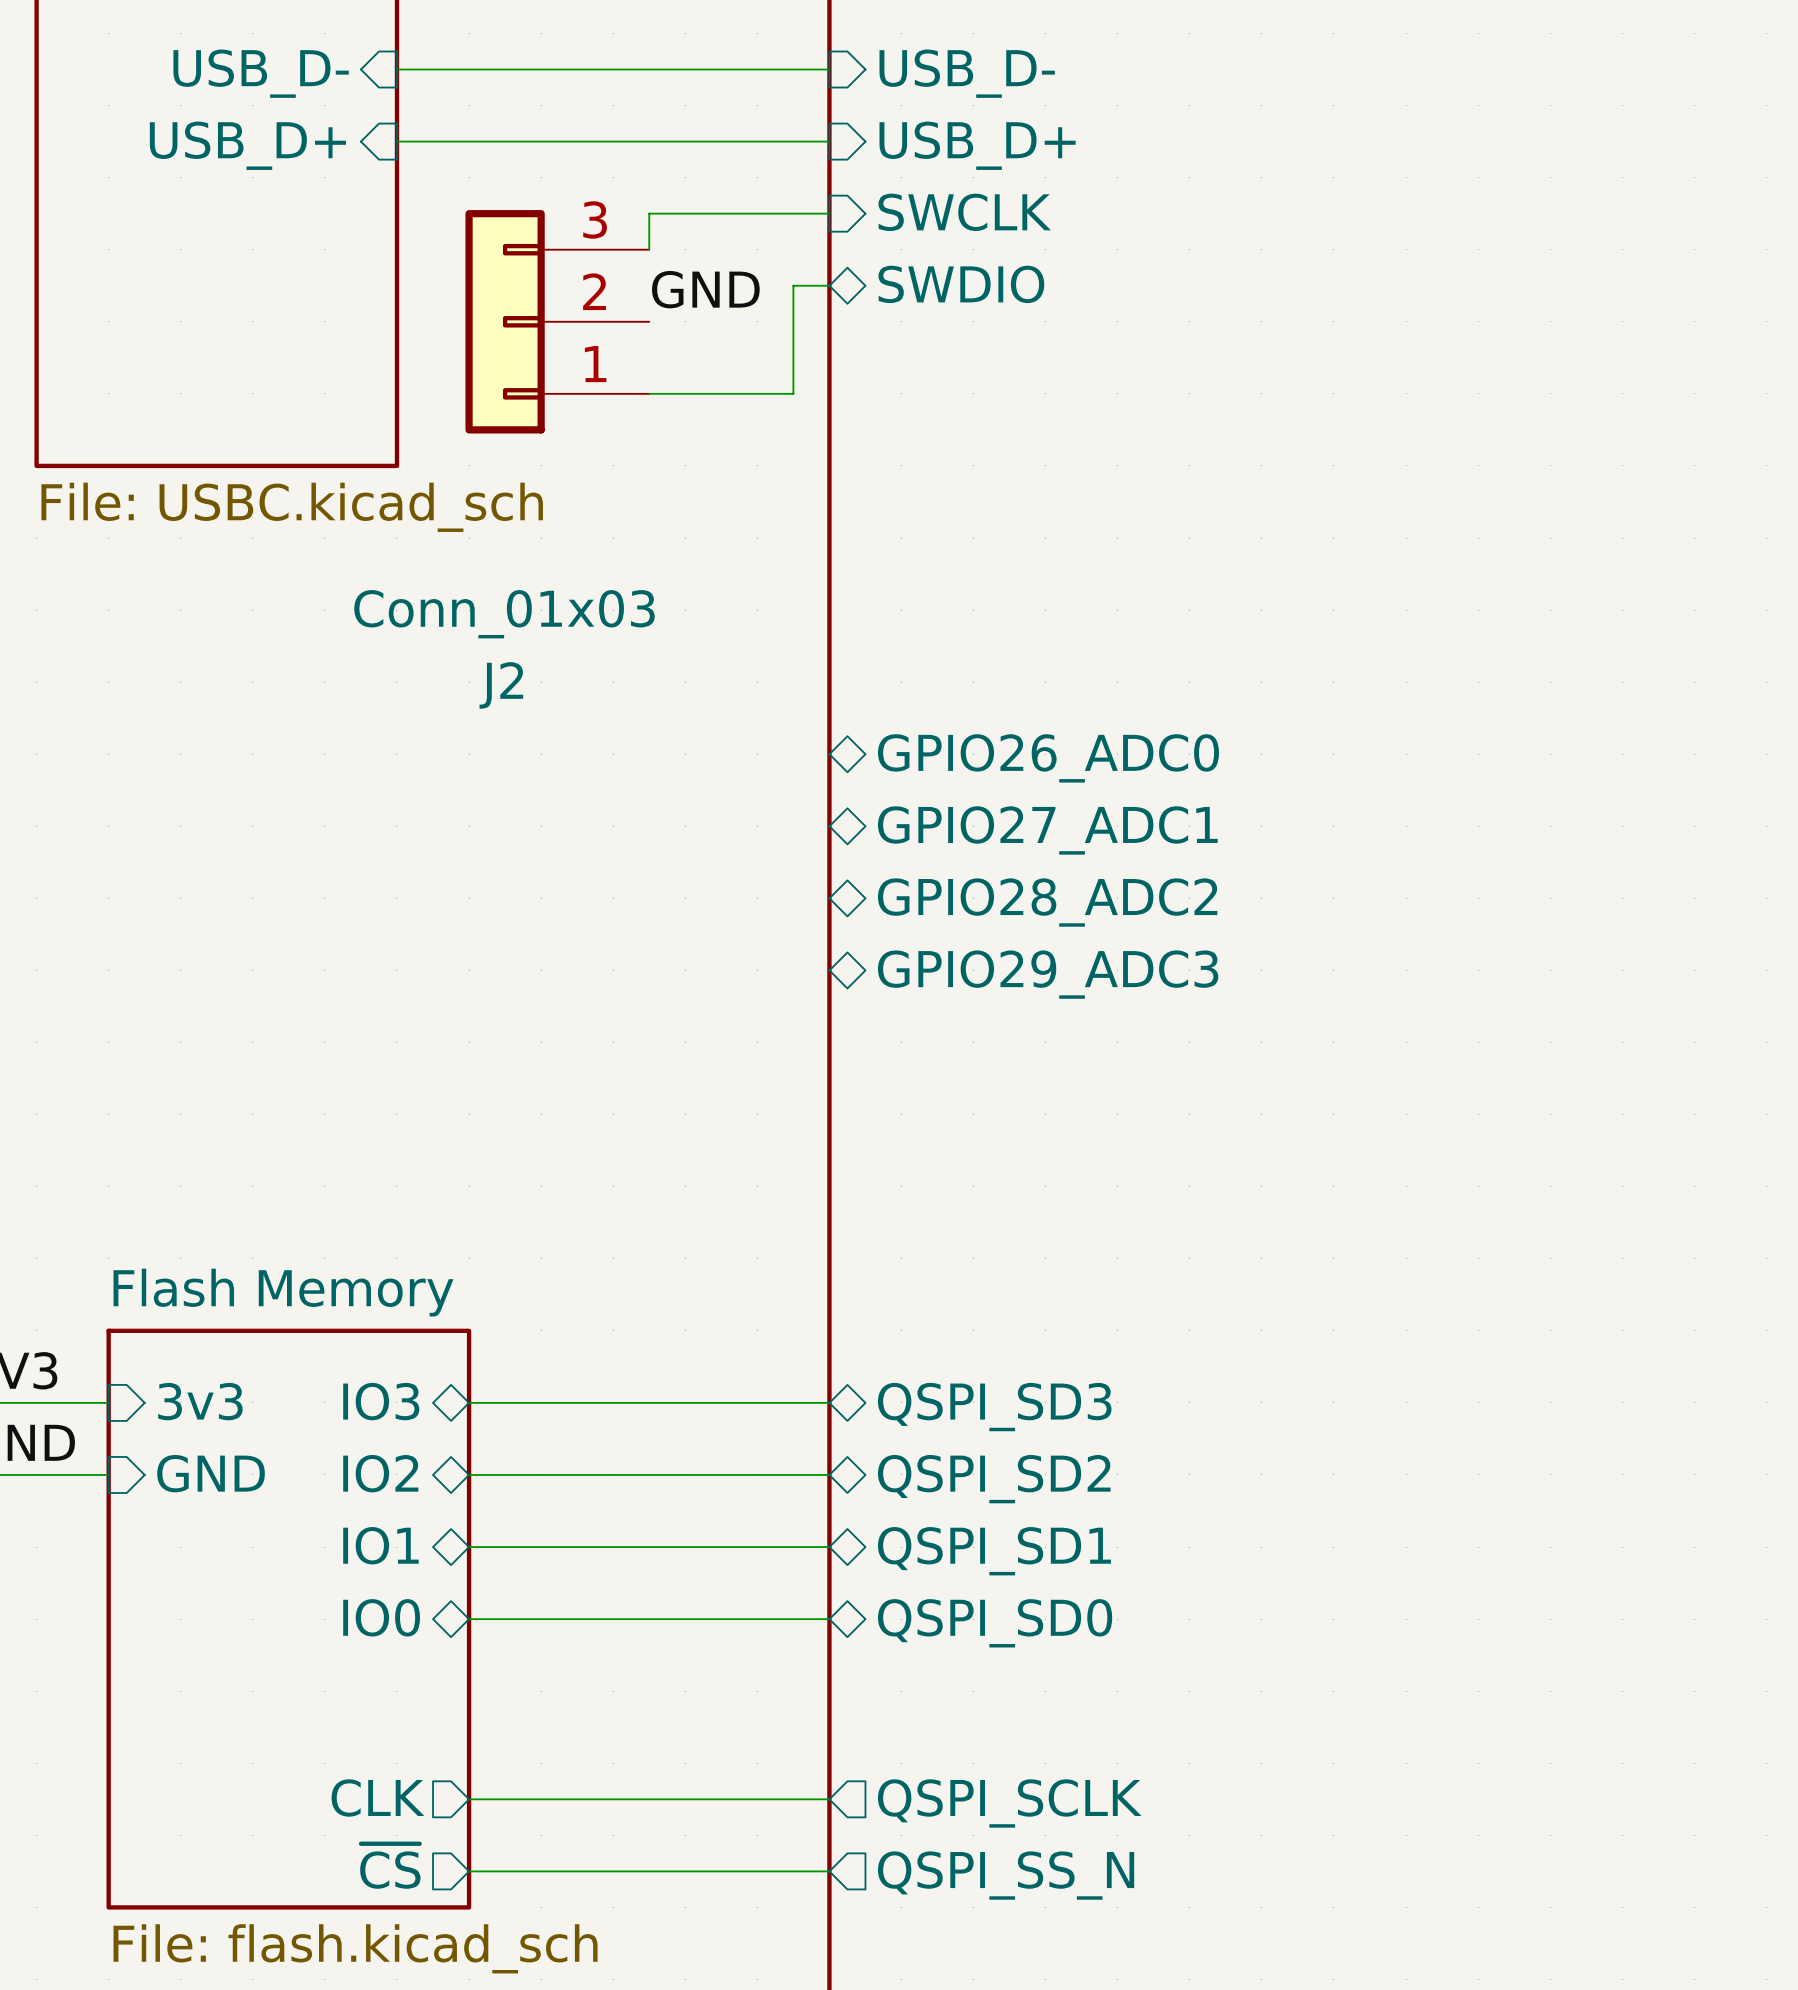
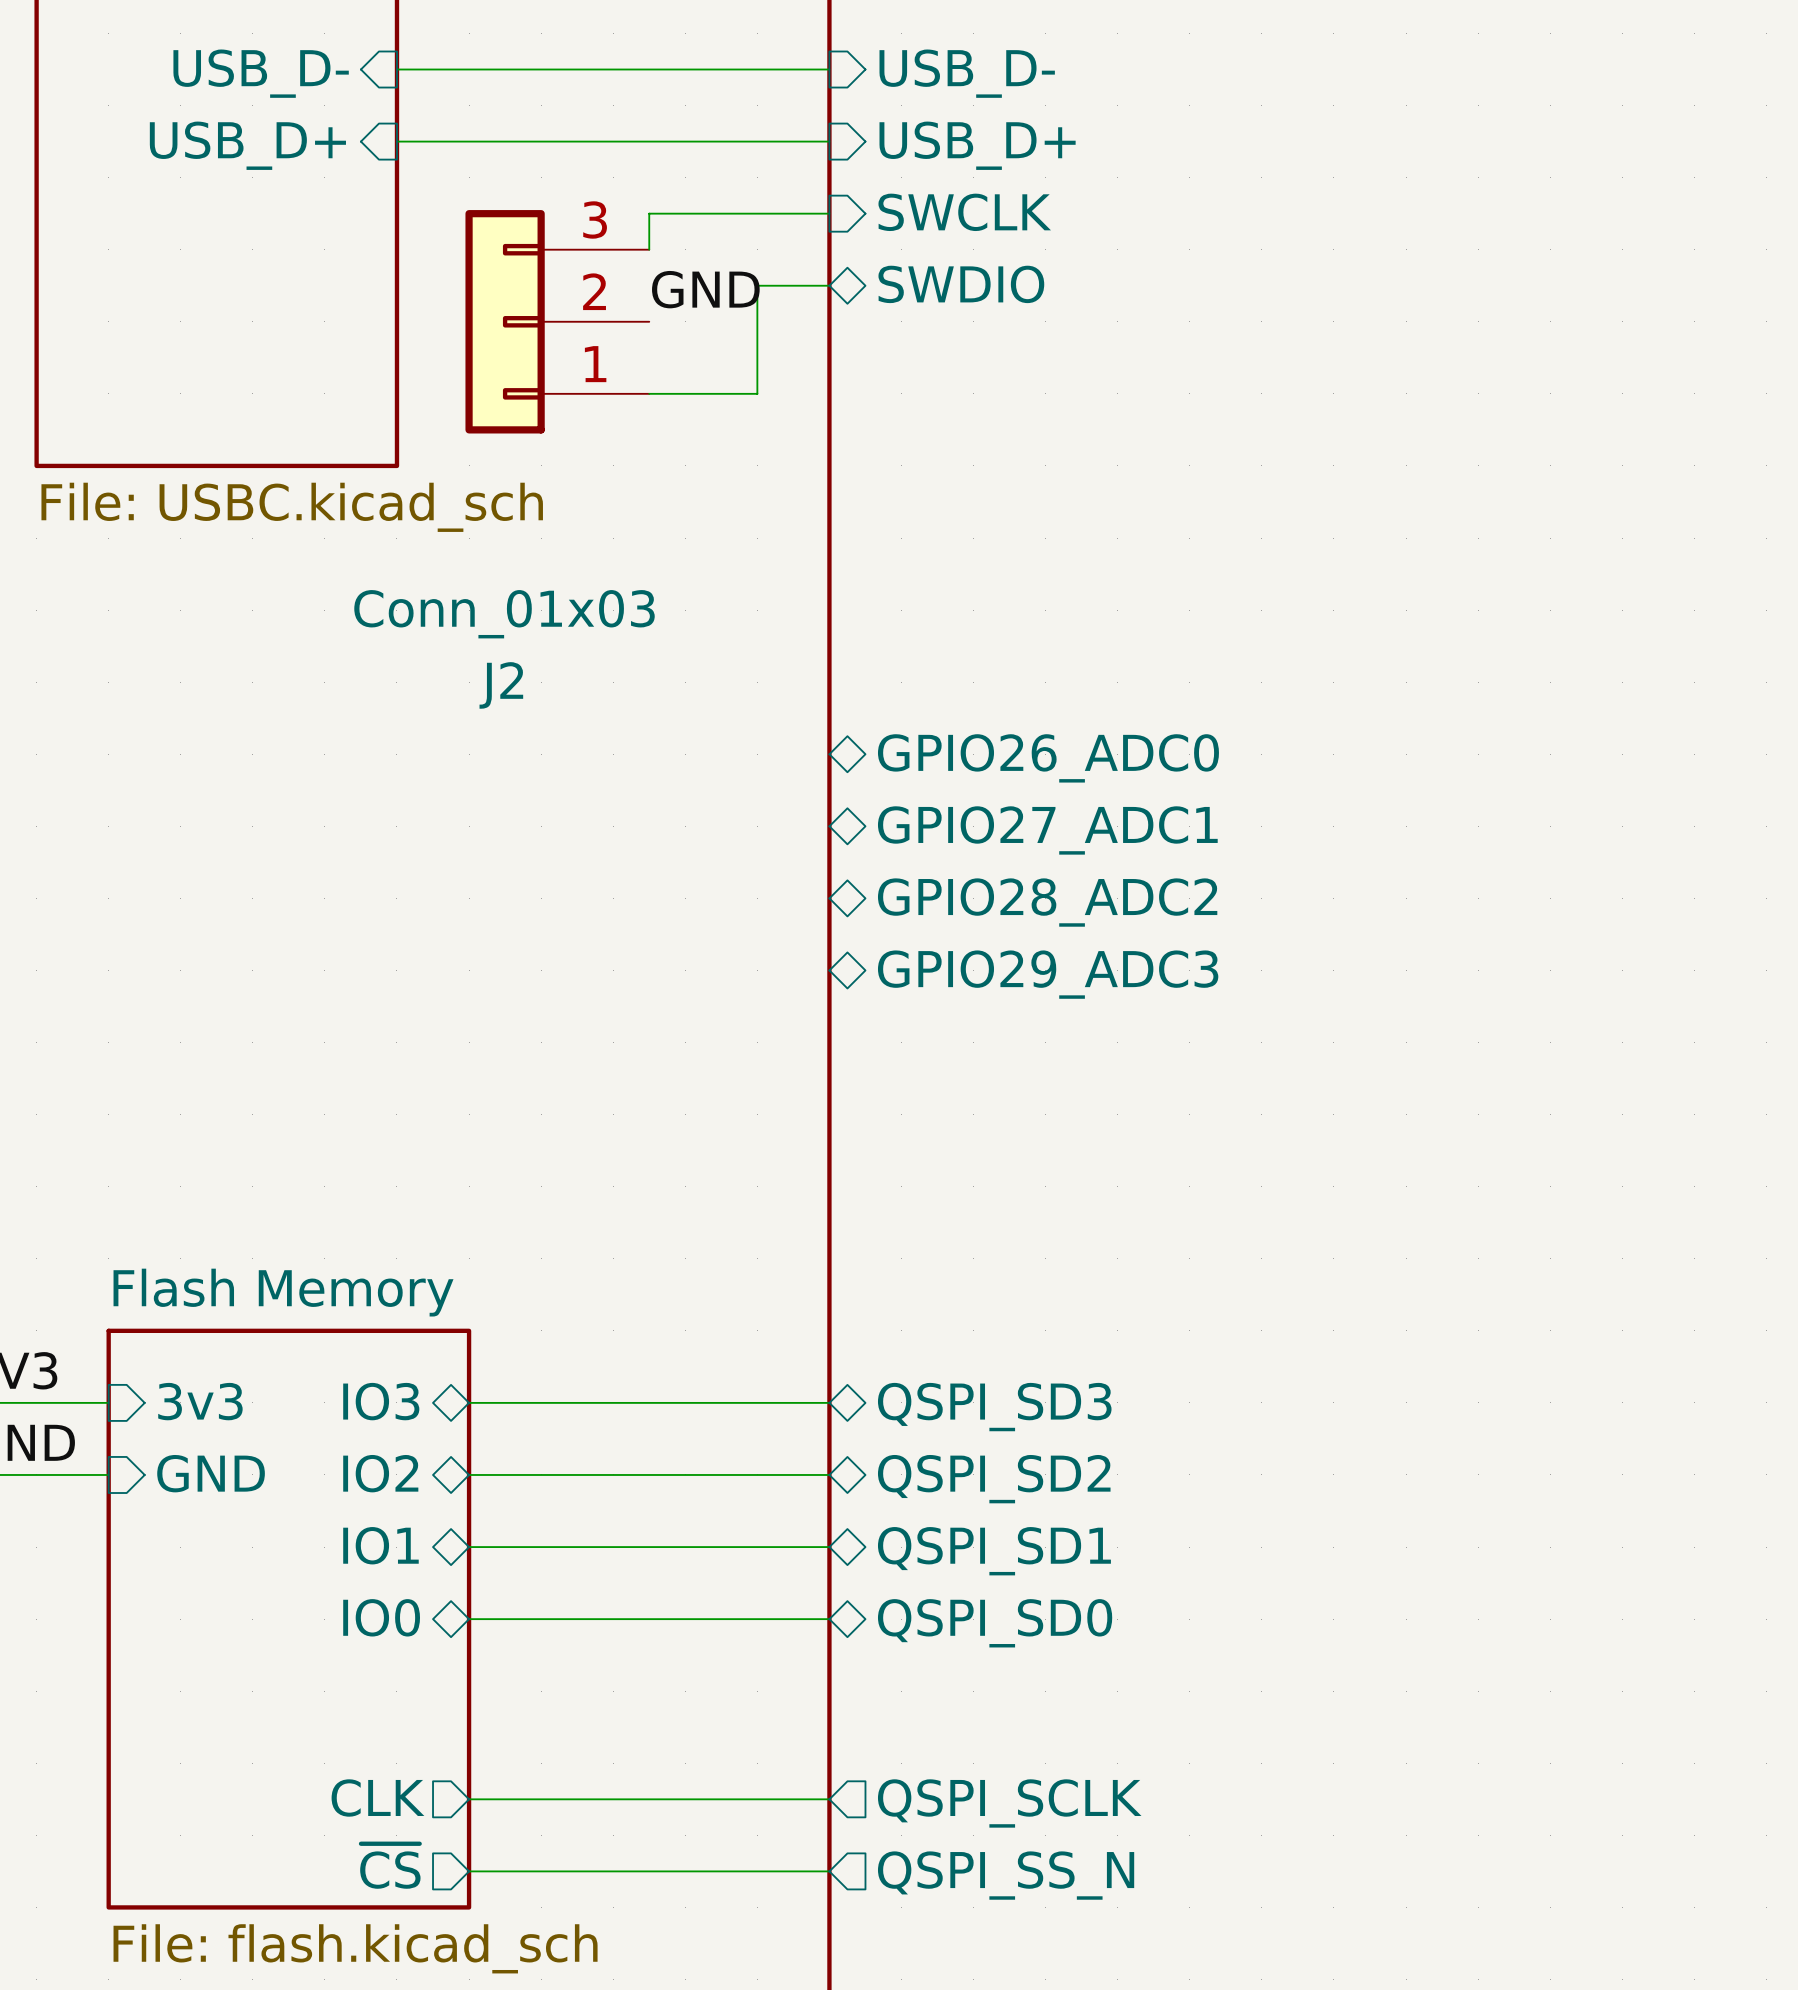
wire: (793, 285) (793, 393) (757, 393) -> (793, 285) (757, 285) (757, 393)

